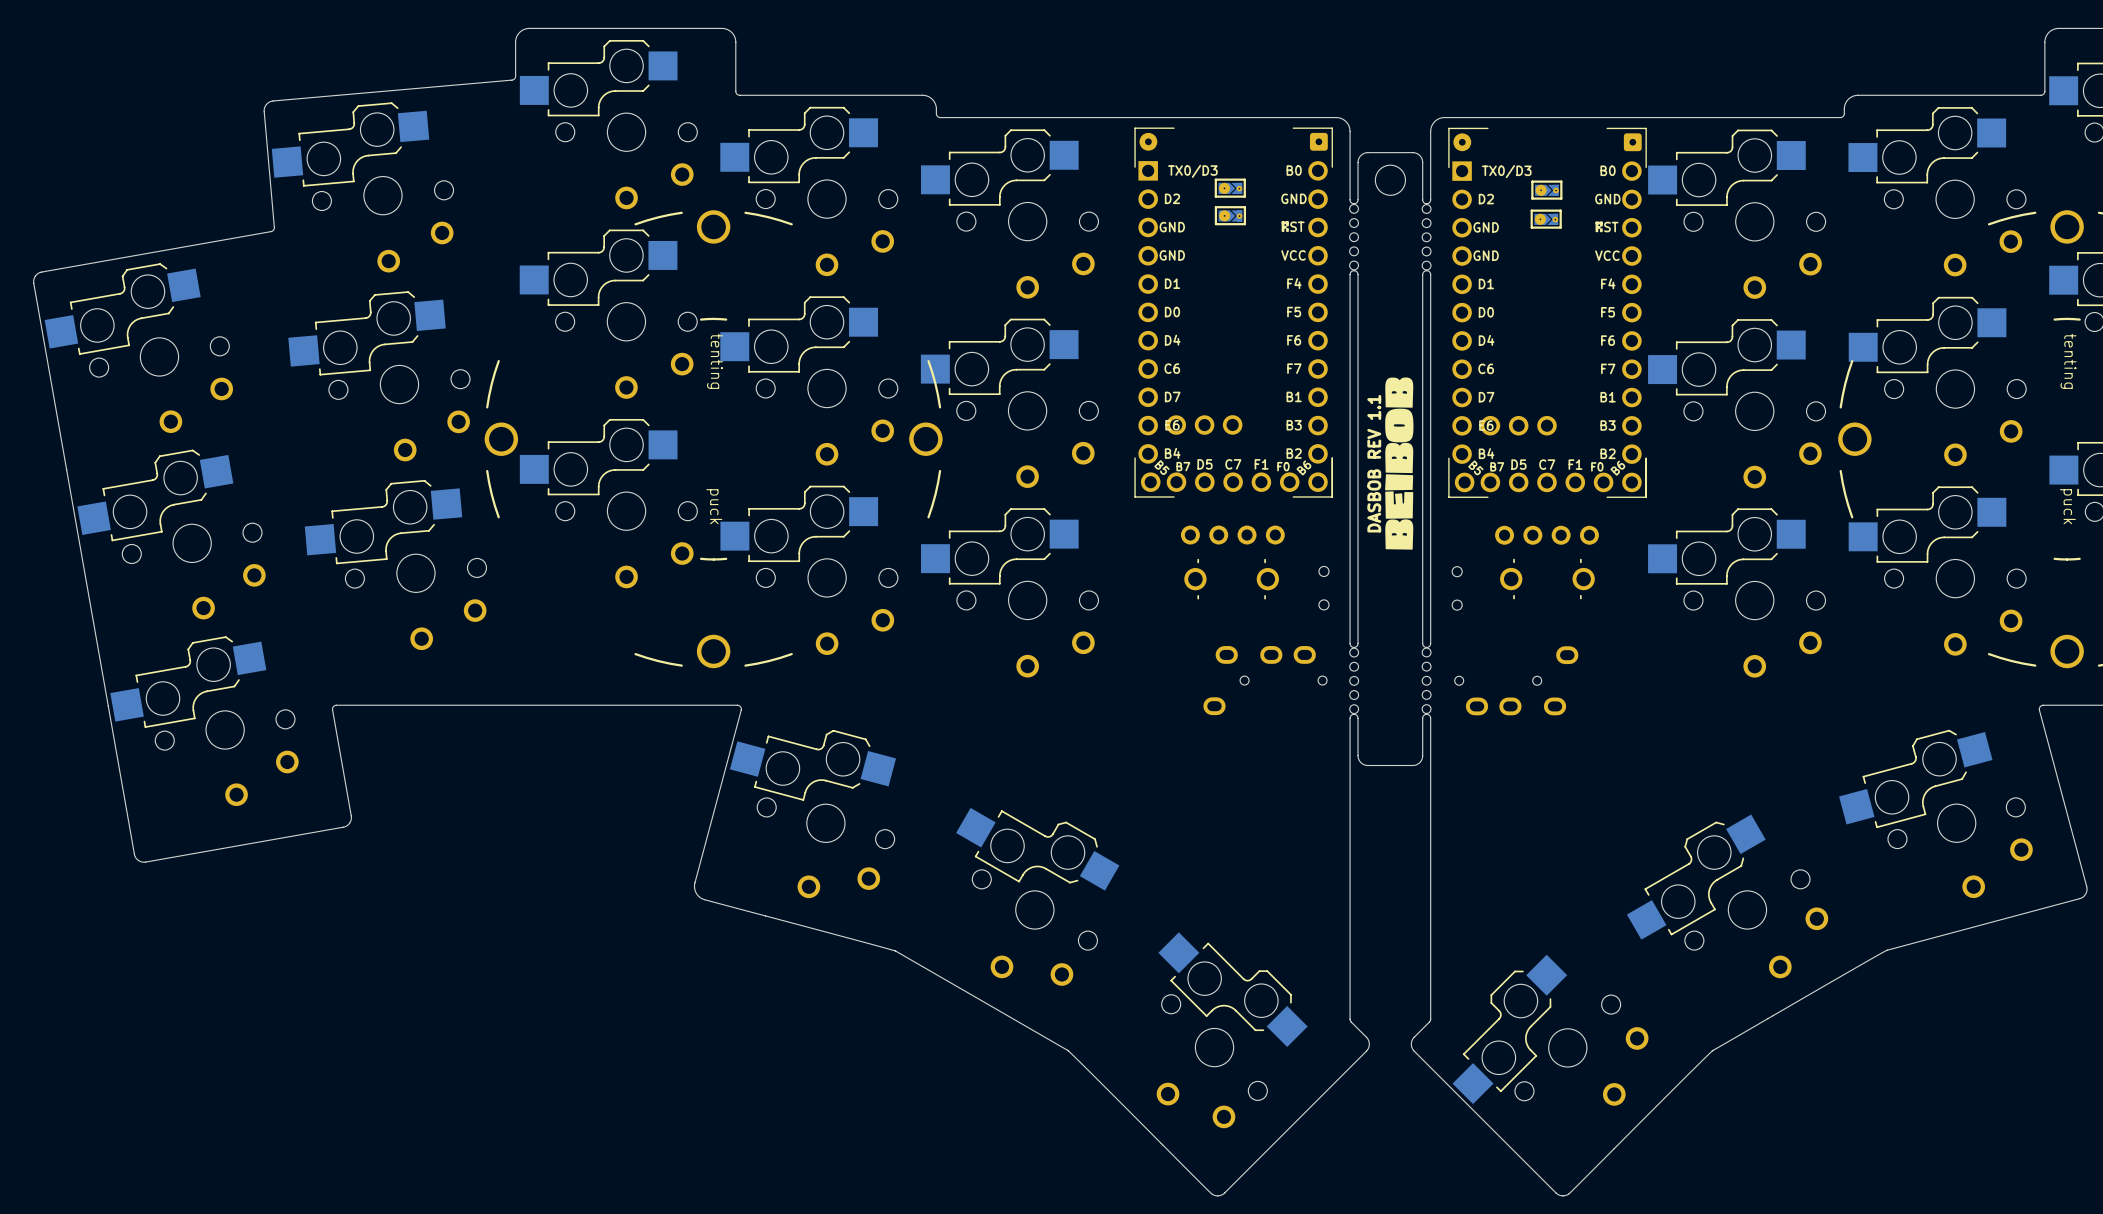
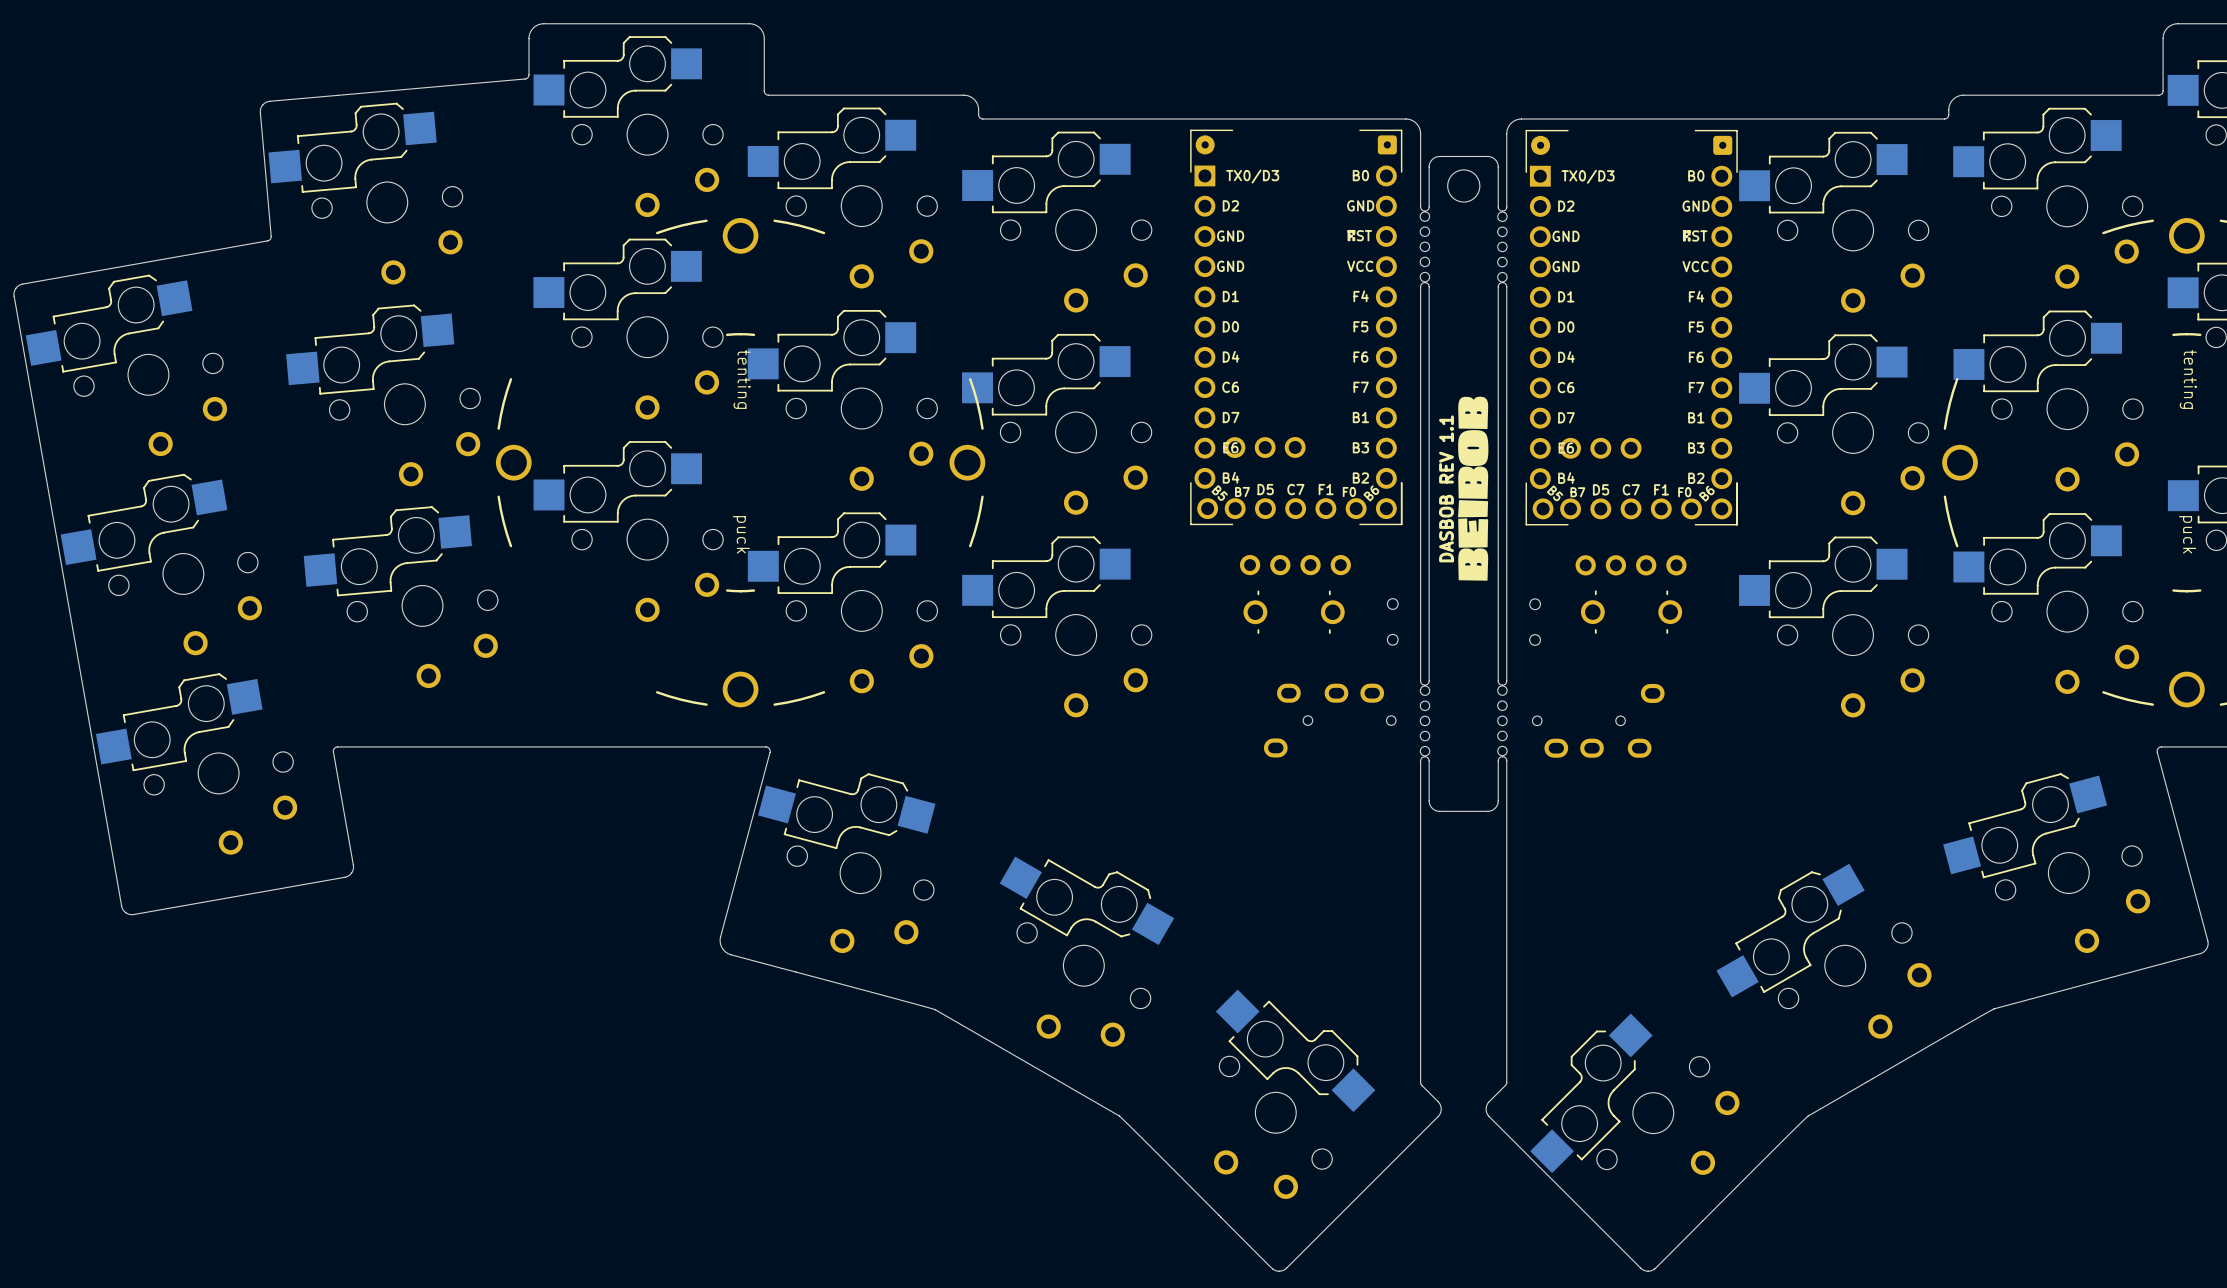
part: (1230, 188) -> none
part: (1546, 190) -> none
part: (1230, 215) -> none
part: (1546, 219) -> none

